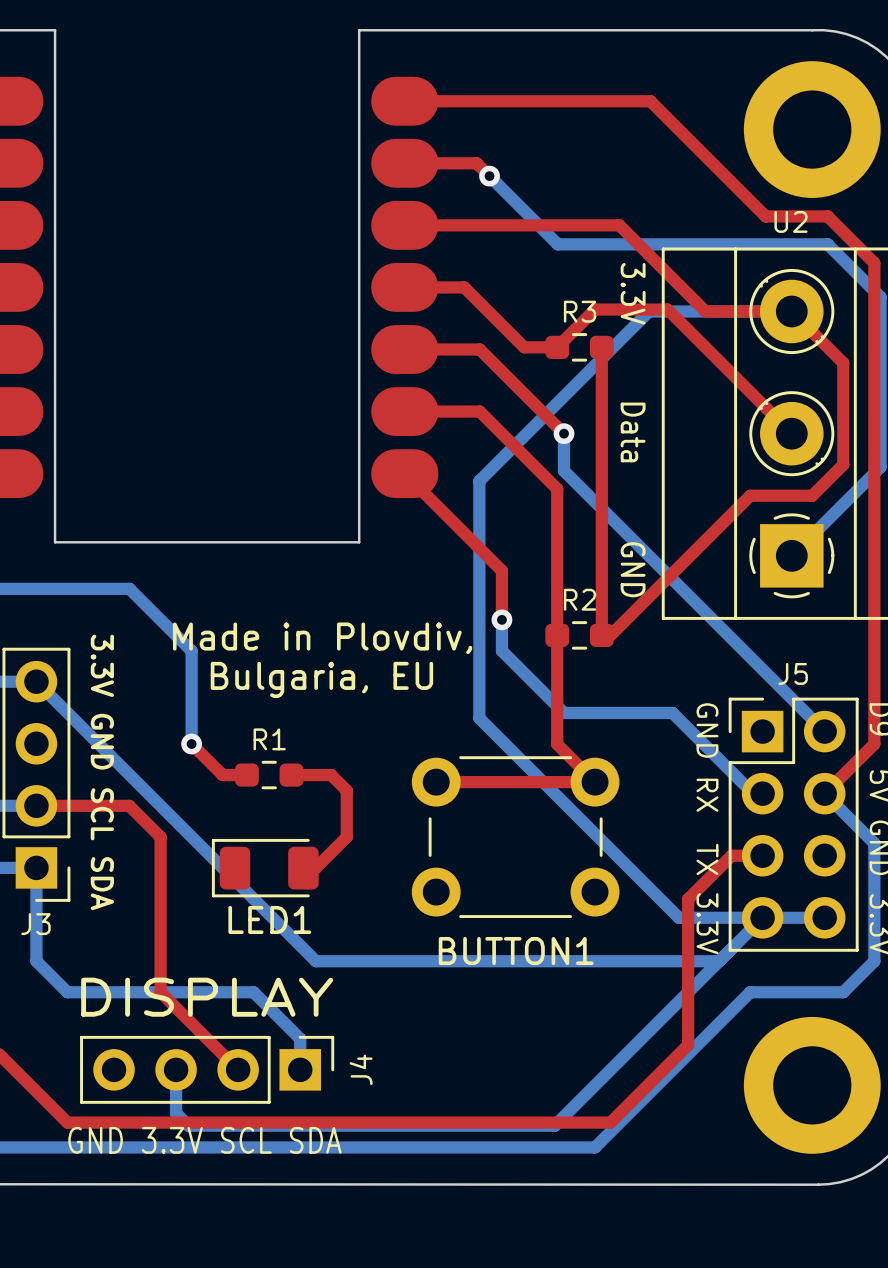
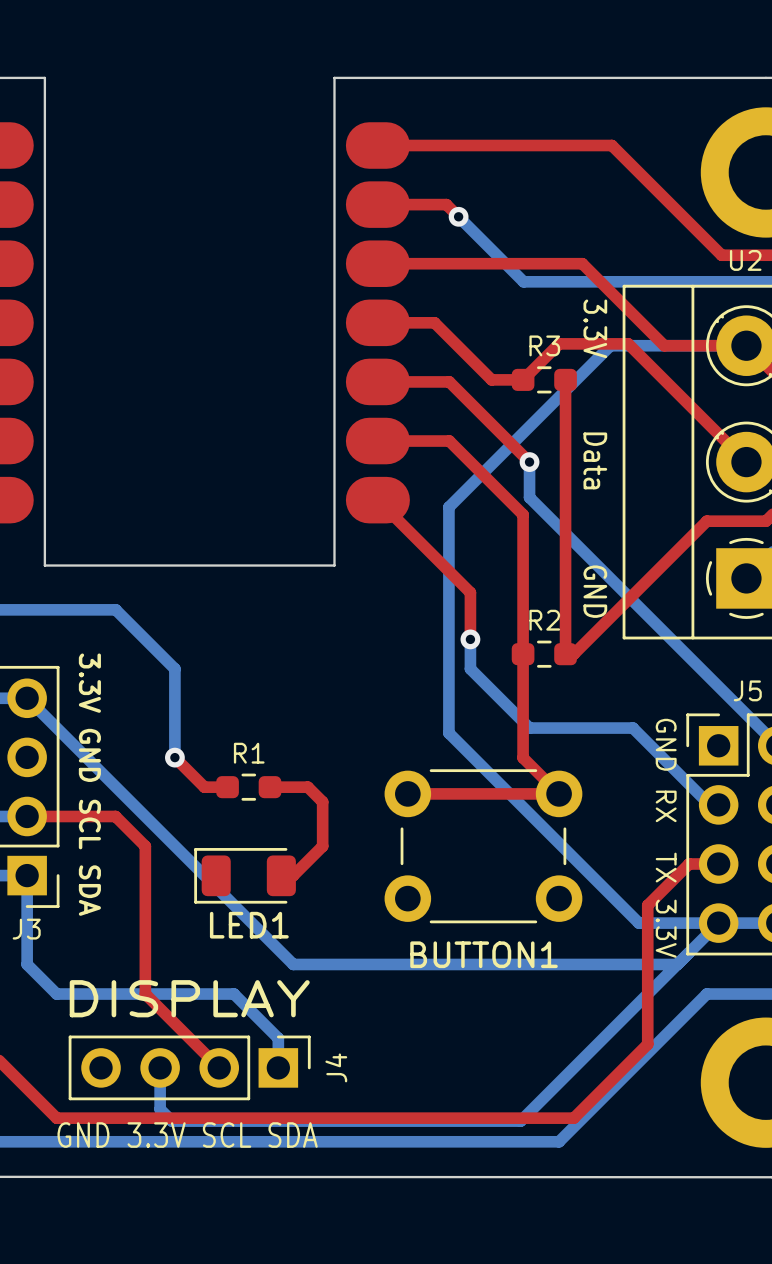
text: Made in Plovdiv, (322, 638) -> none
text: Bulgaria, EU (321, 679) -> none

